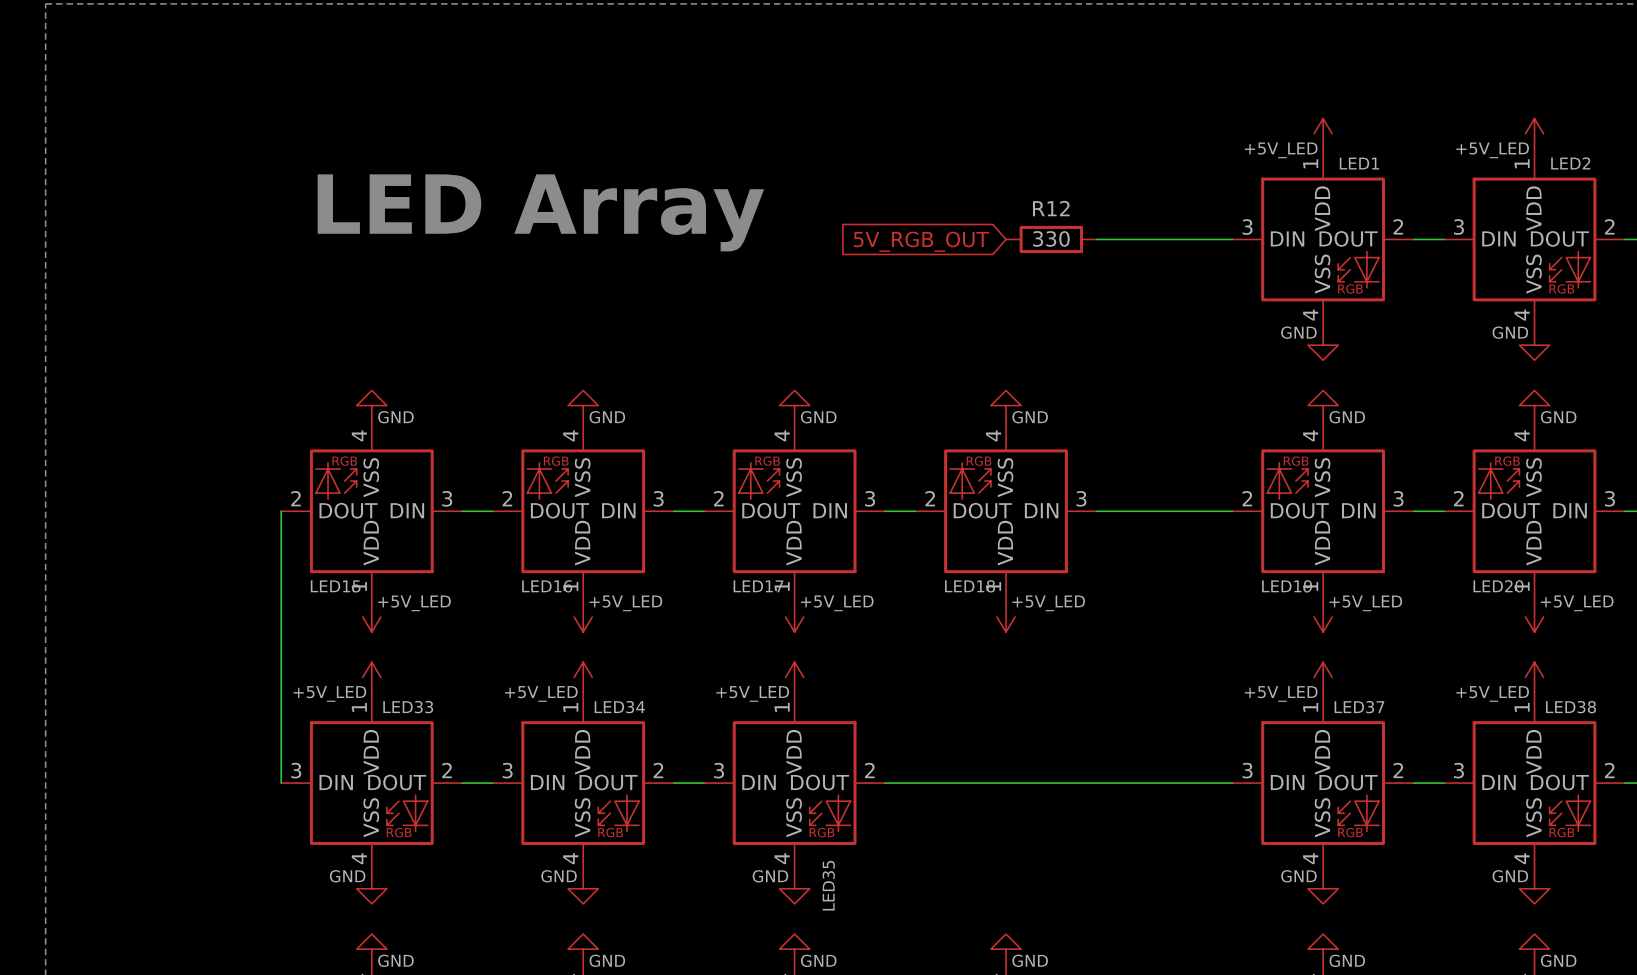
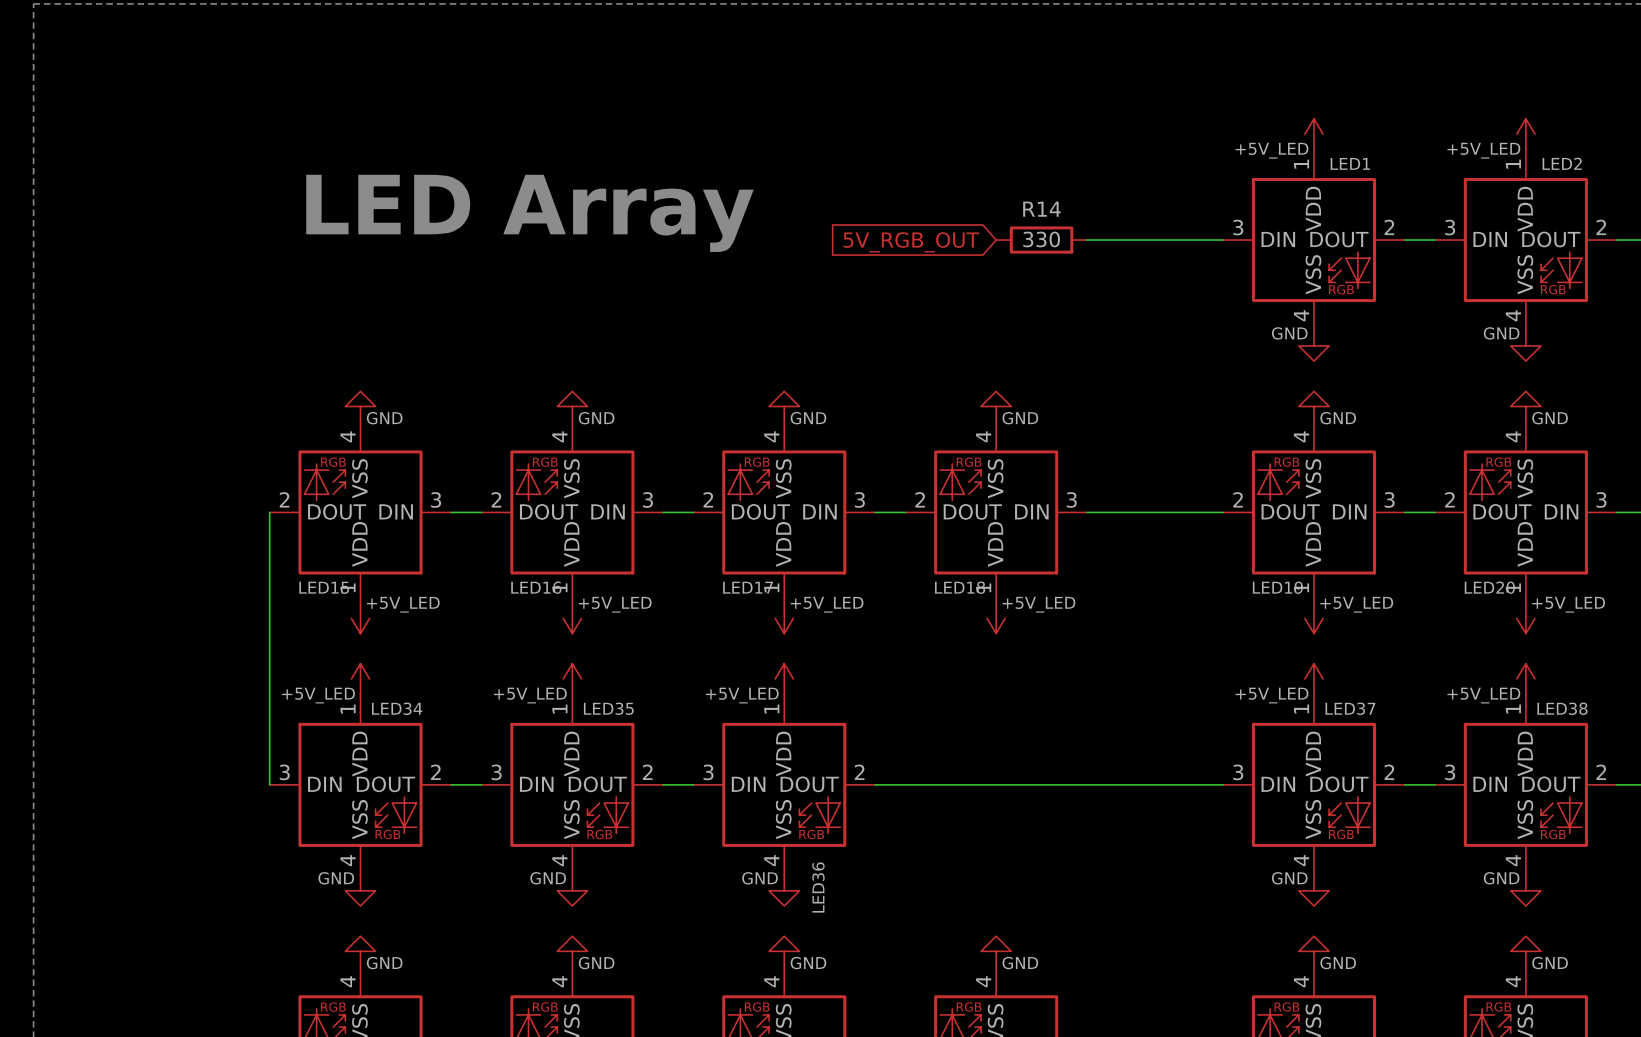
R12 name: R12 (1051, 208) -> R14 (1042, 209)
LED33 name: LED33 (408, 707) -> LED34 (397, 708)
LED34 name: LED34 (619, 707) -> LED35 (608, 708)
LED35 name: LED35 (828, 885) -> LED36 (818, 887)

